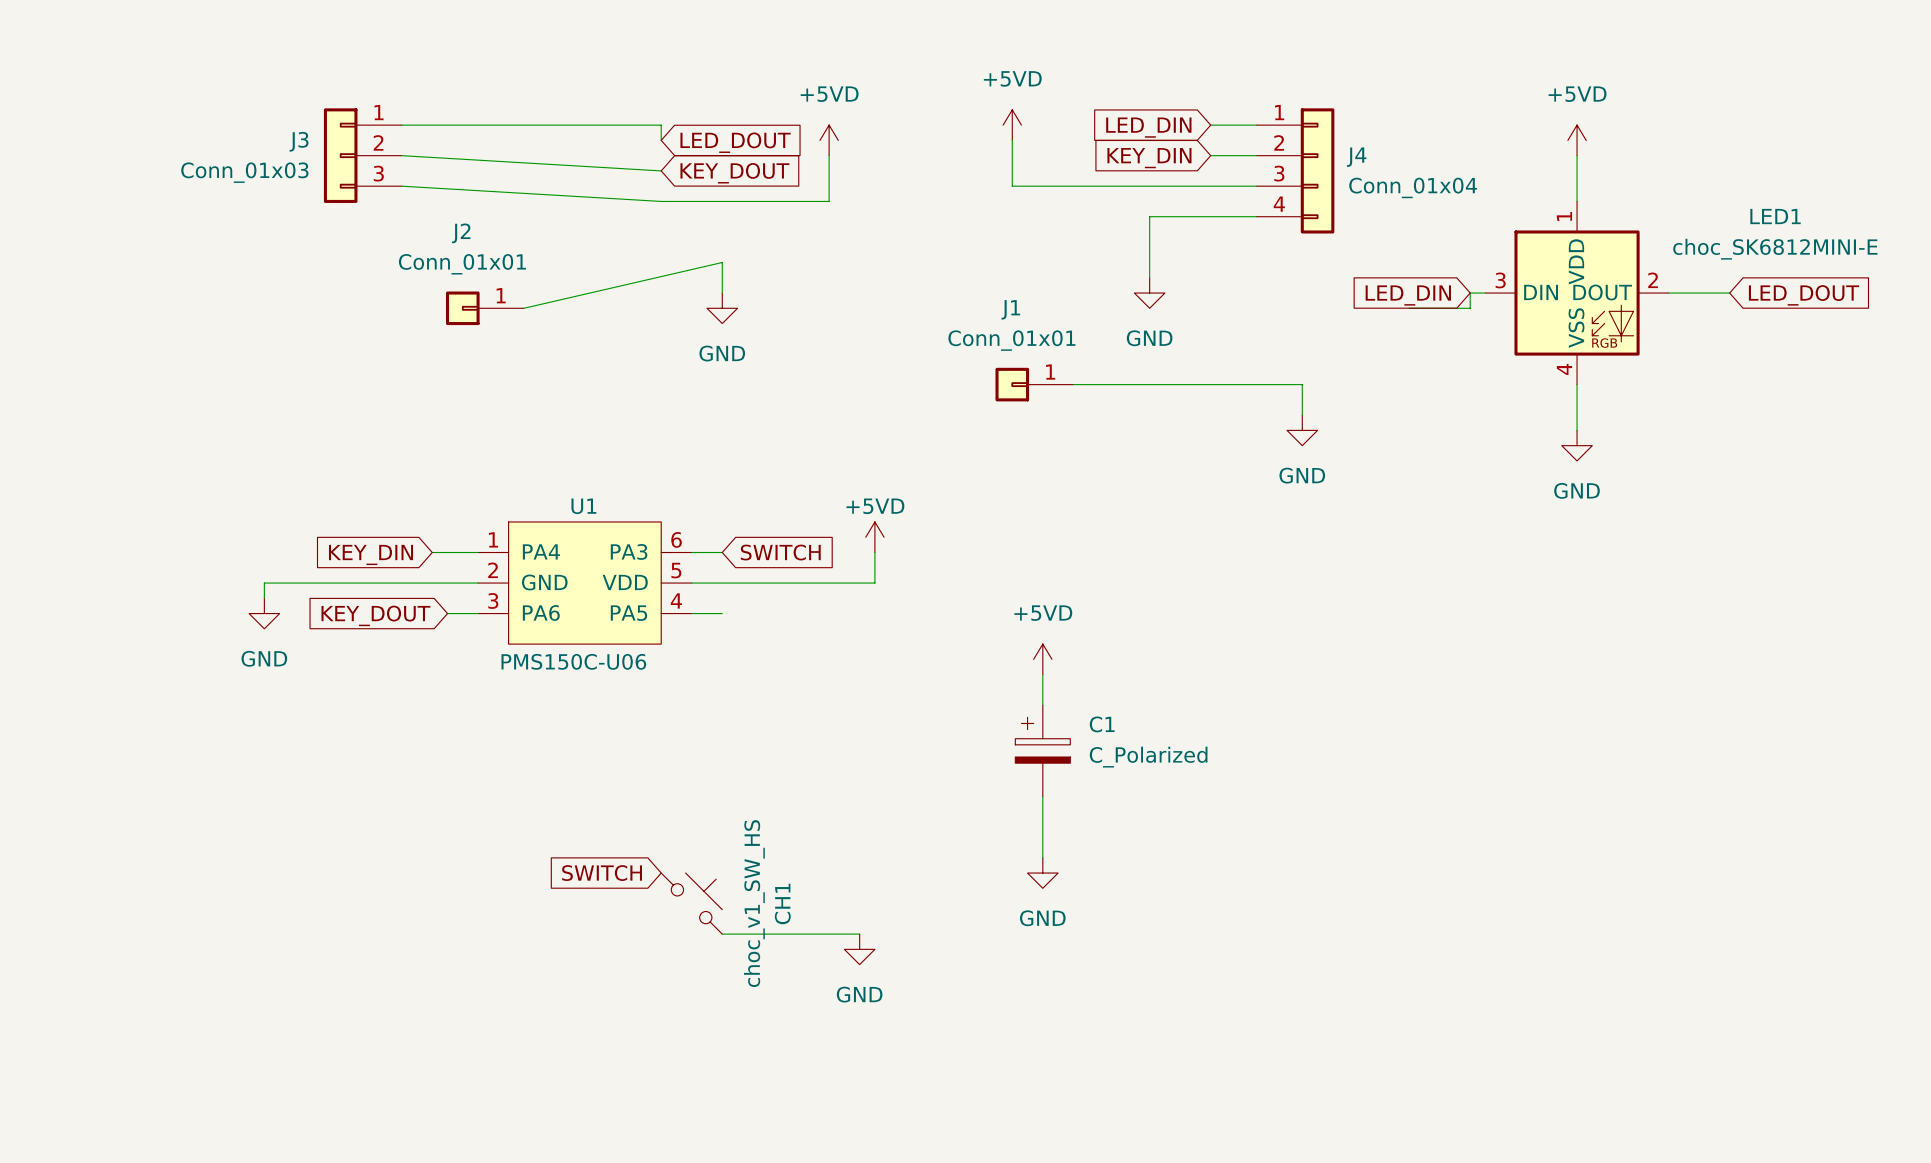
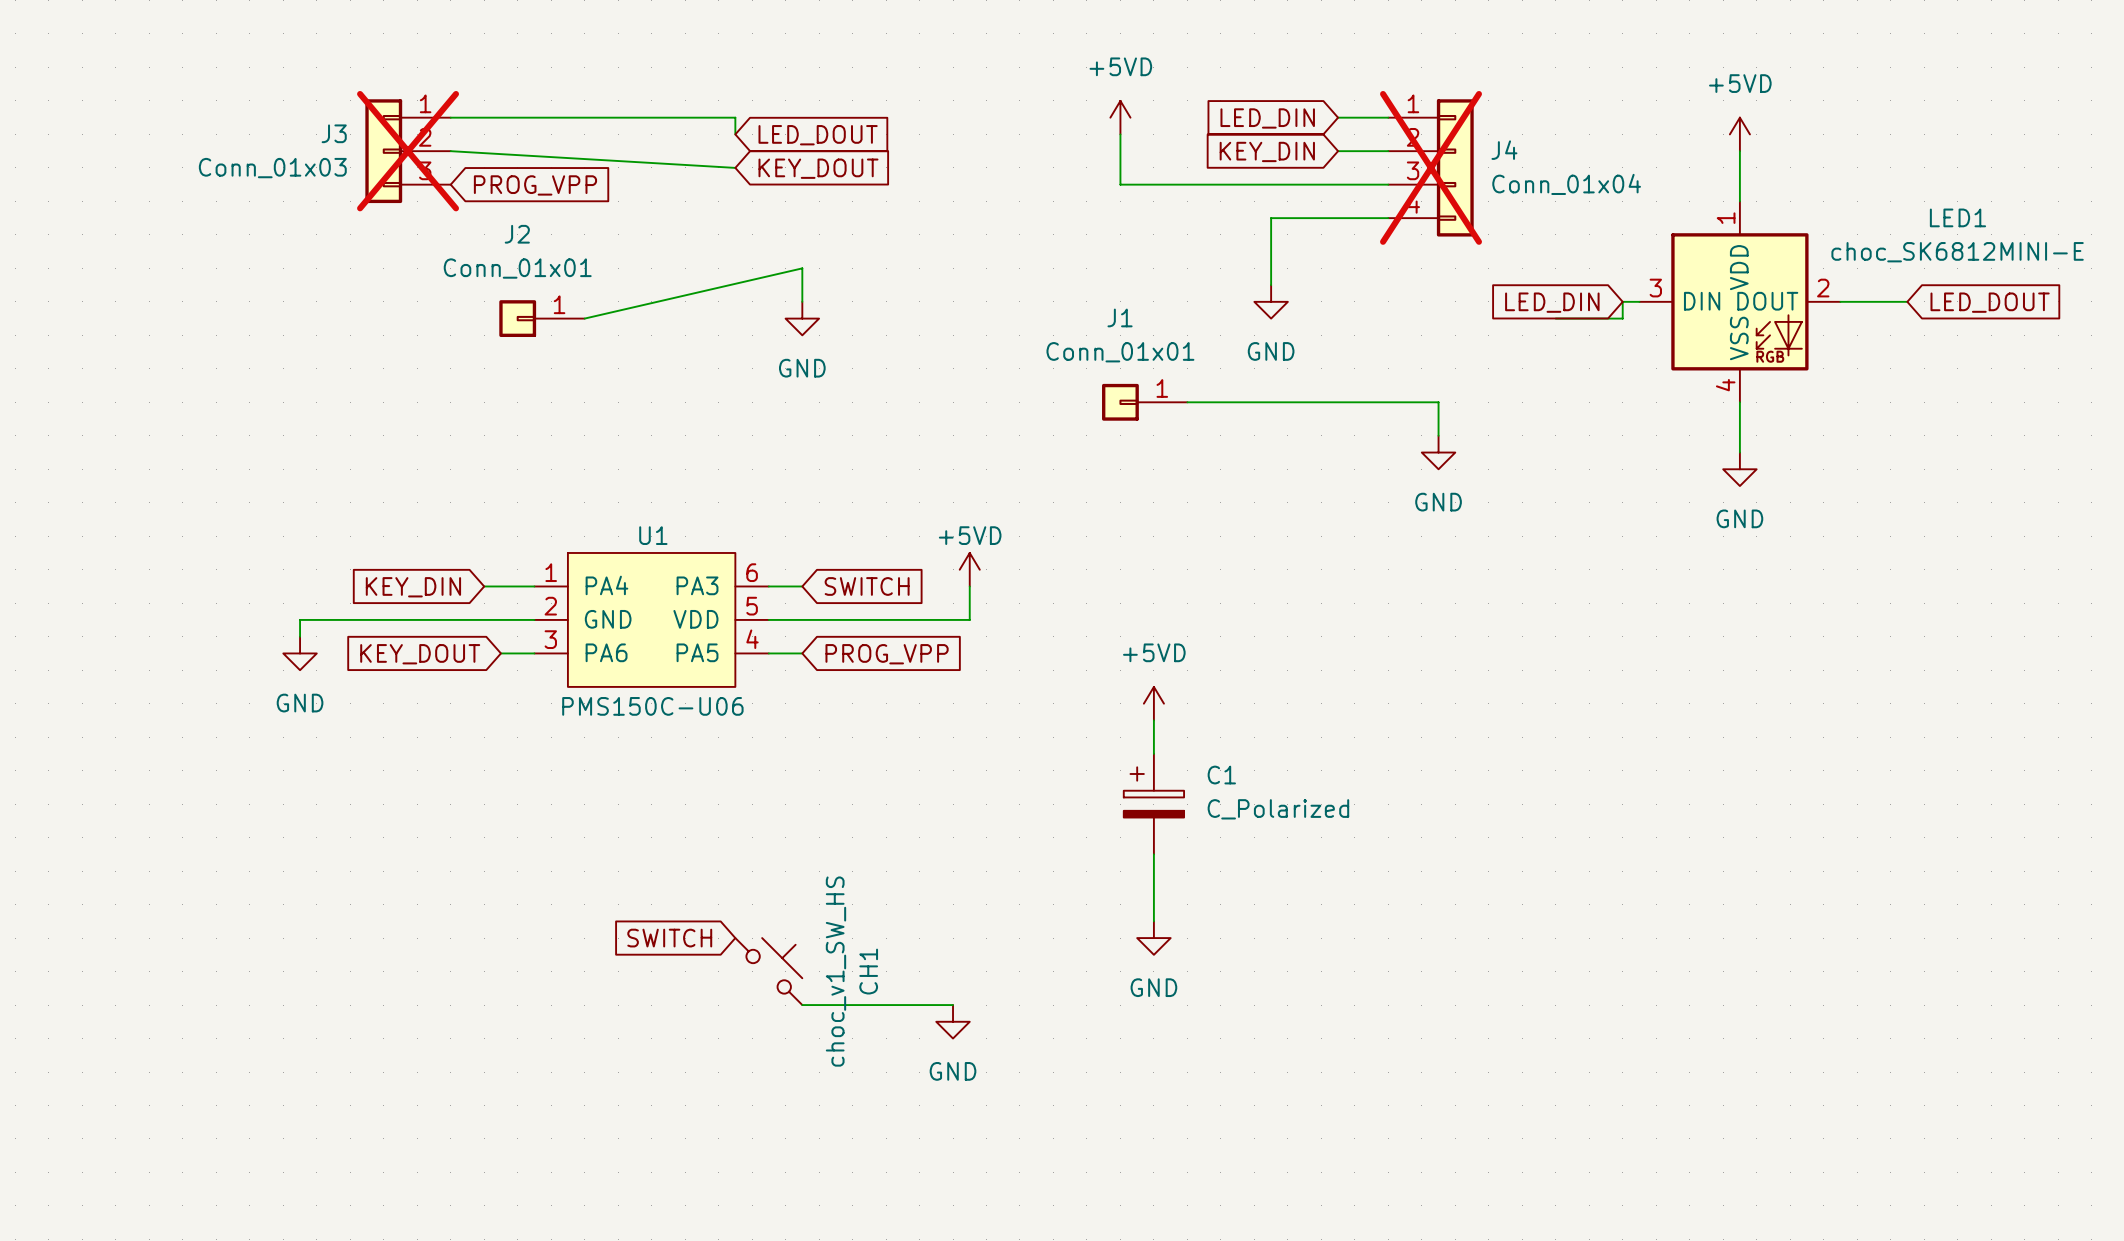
power symbol: +5VD (829, 140) -> none
J3 do-not-place cross: none -> (408, 151)
wire: (829, 155) (829, 201) (661, 201) (401, 186) -> none
J4 do-not-place cross: none -> (1431, 167)
global label: none -> PROG_VPP (535, 185)
global label: none -> PROG_VPP (887, 654)

